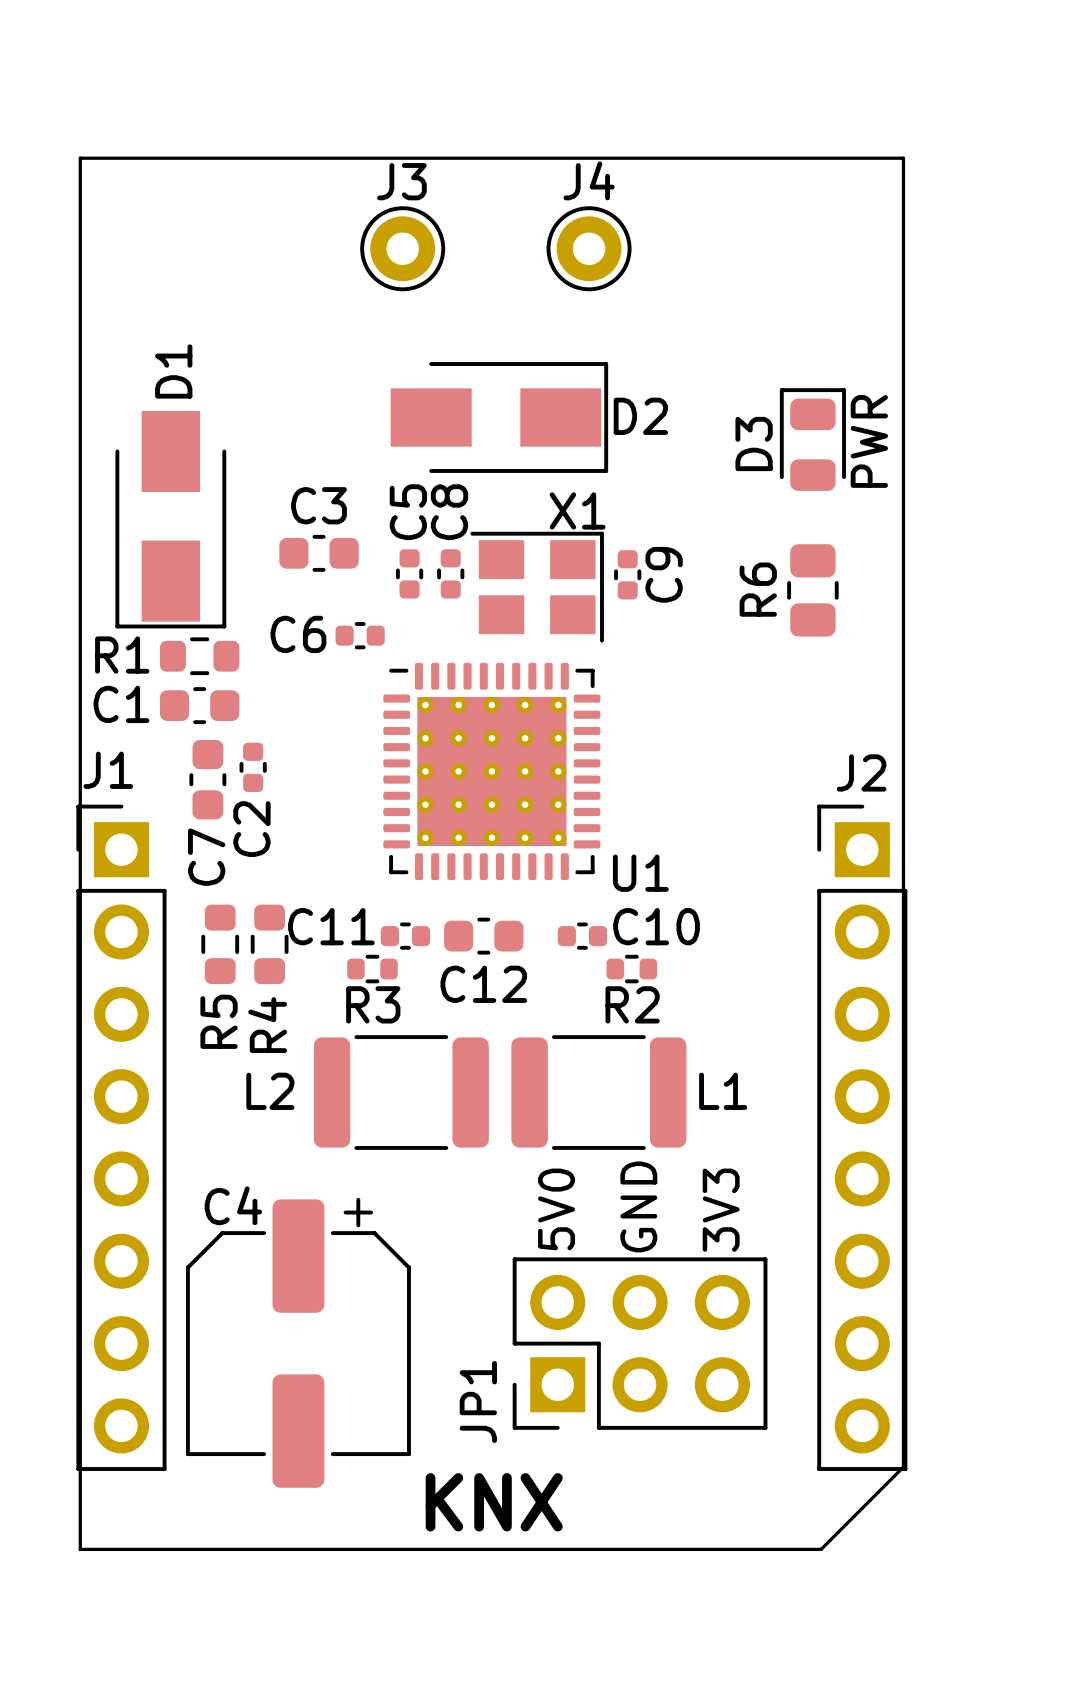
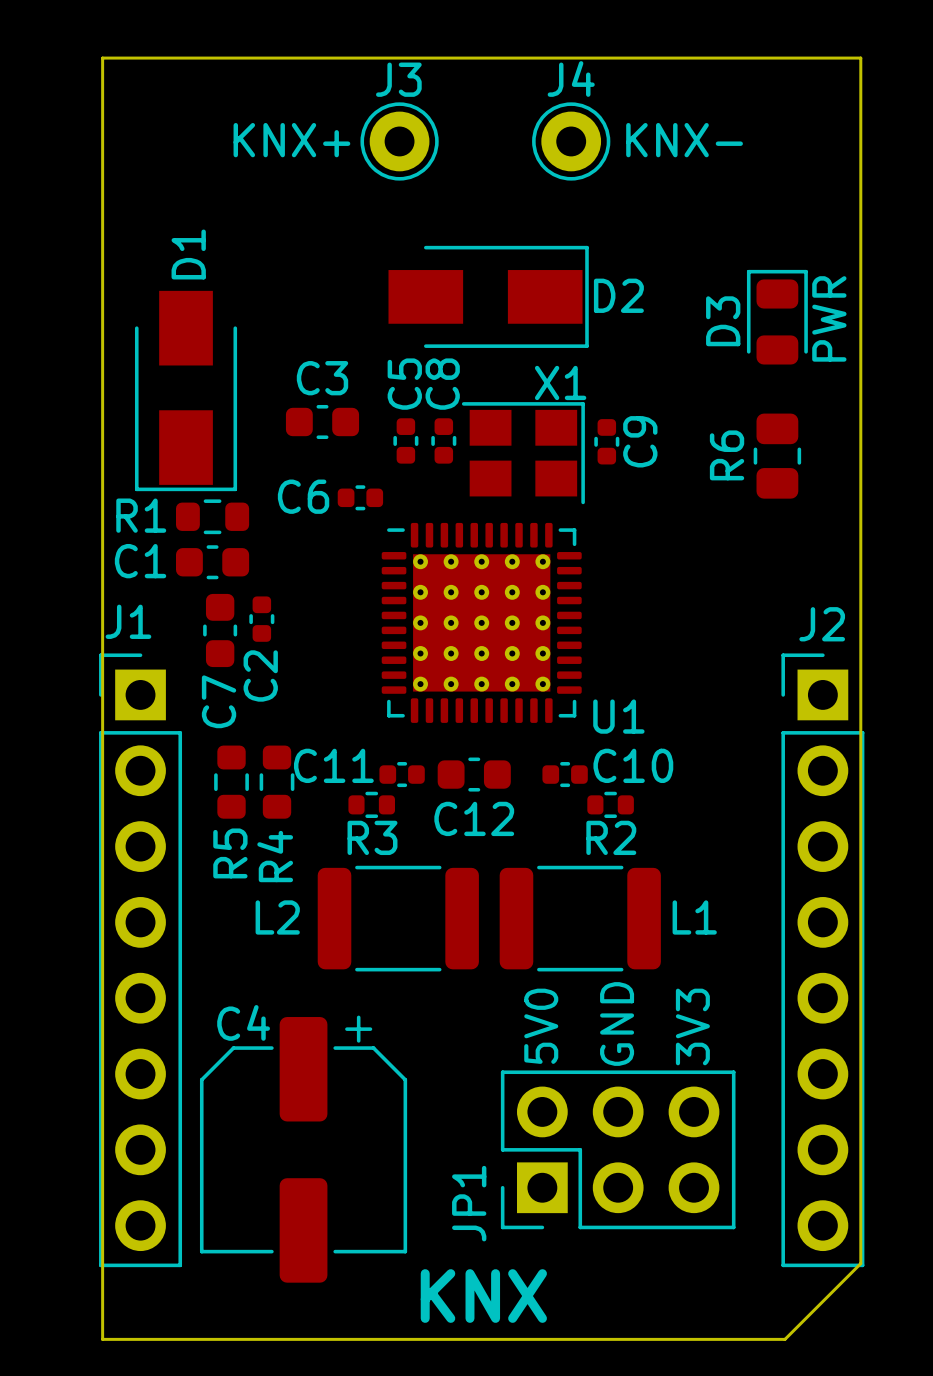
J3 value: none -> KNX+ (291, 140)
J4 value: none -> KNX- (684, 140)

